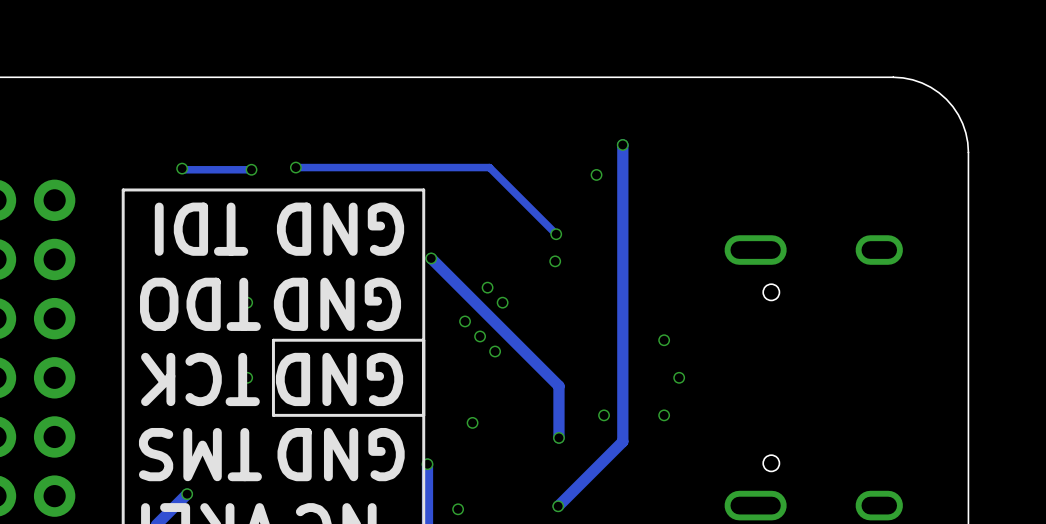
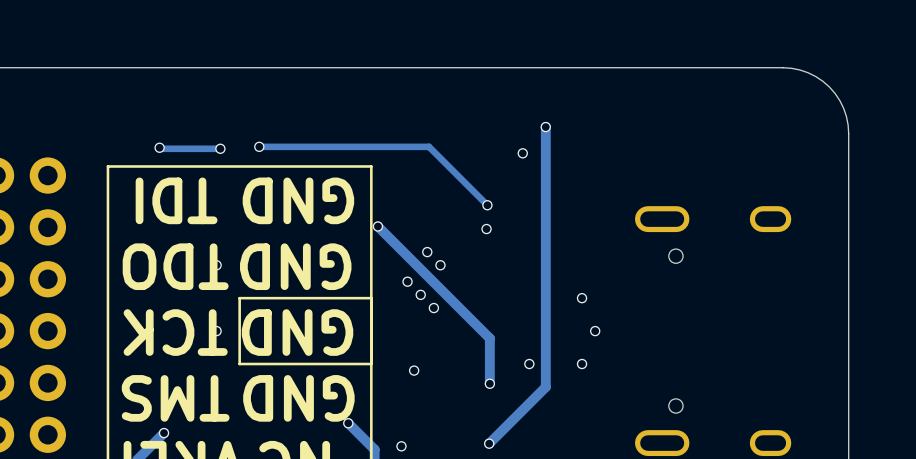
track: (427, 464) (427, 513) -> (348, 423) (374, 449)
via position: (427, 464) -> (348, 423)

